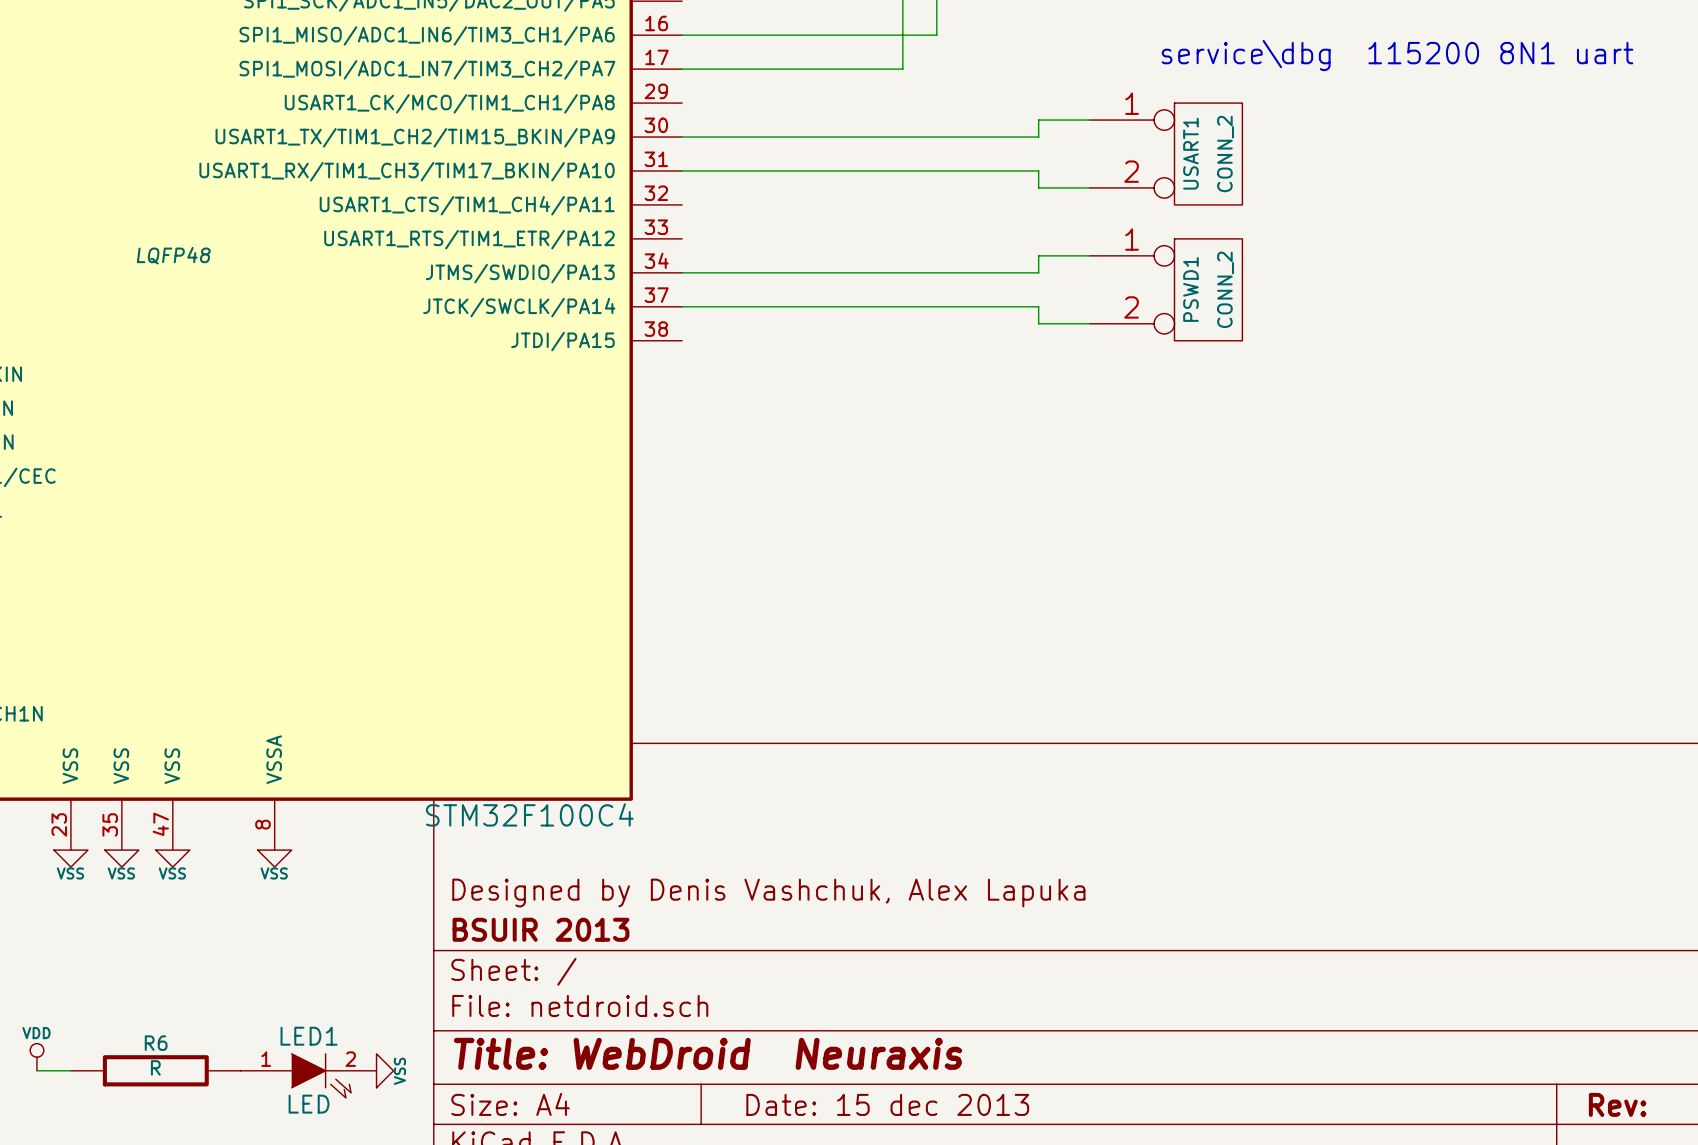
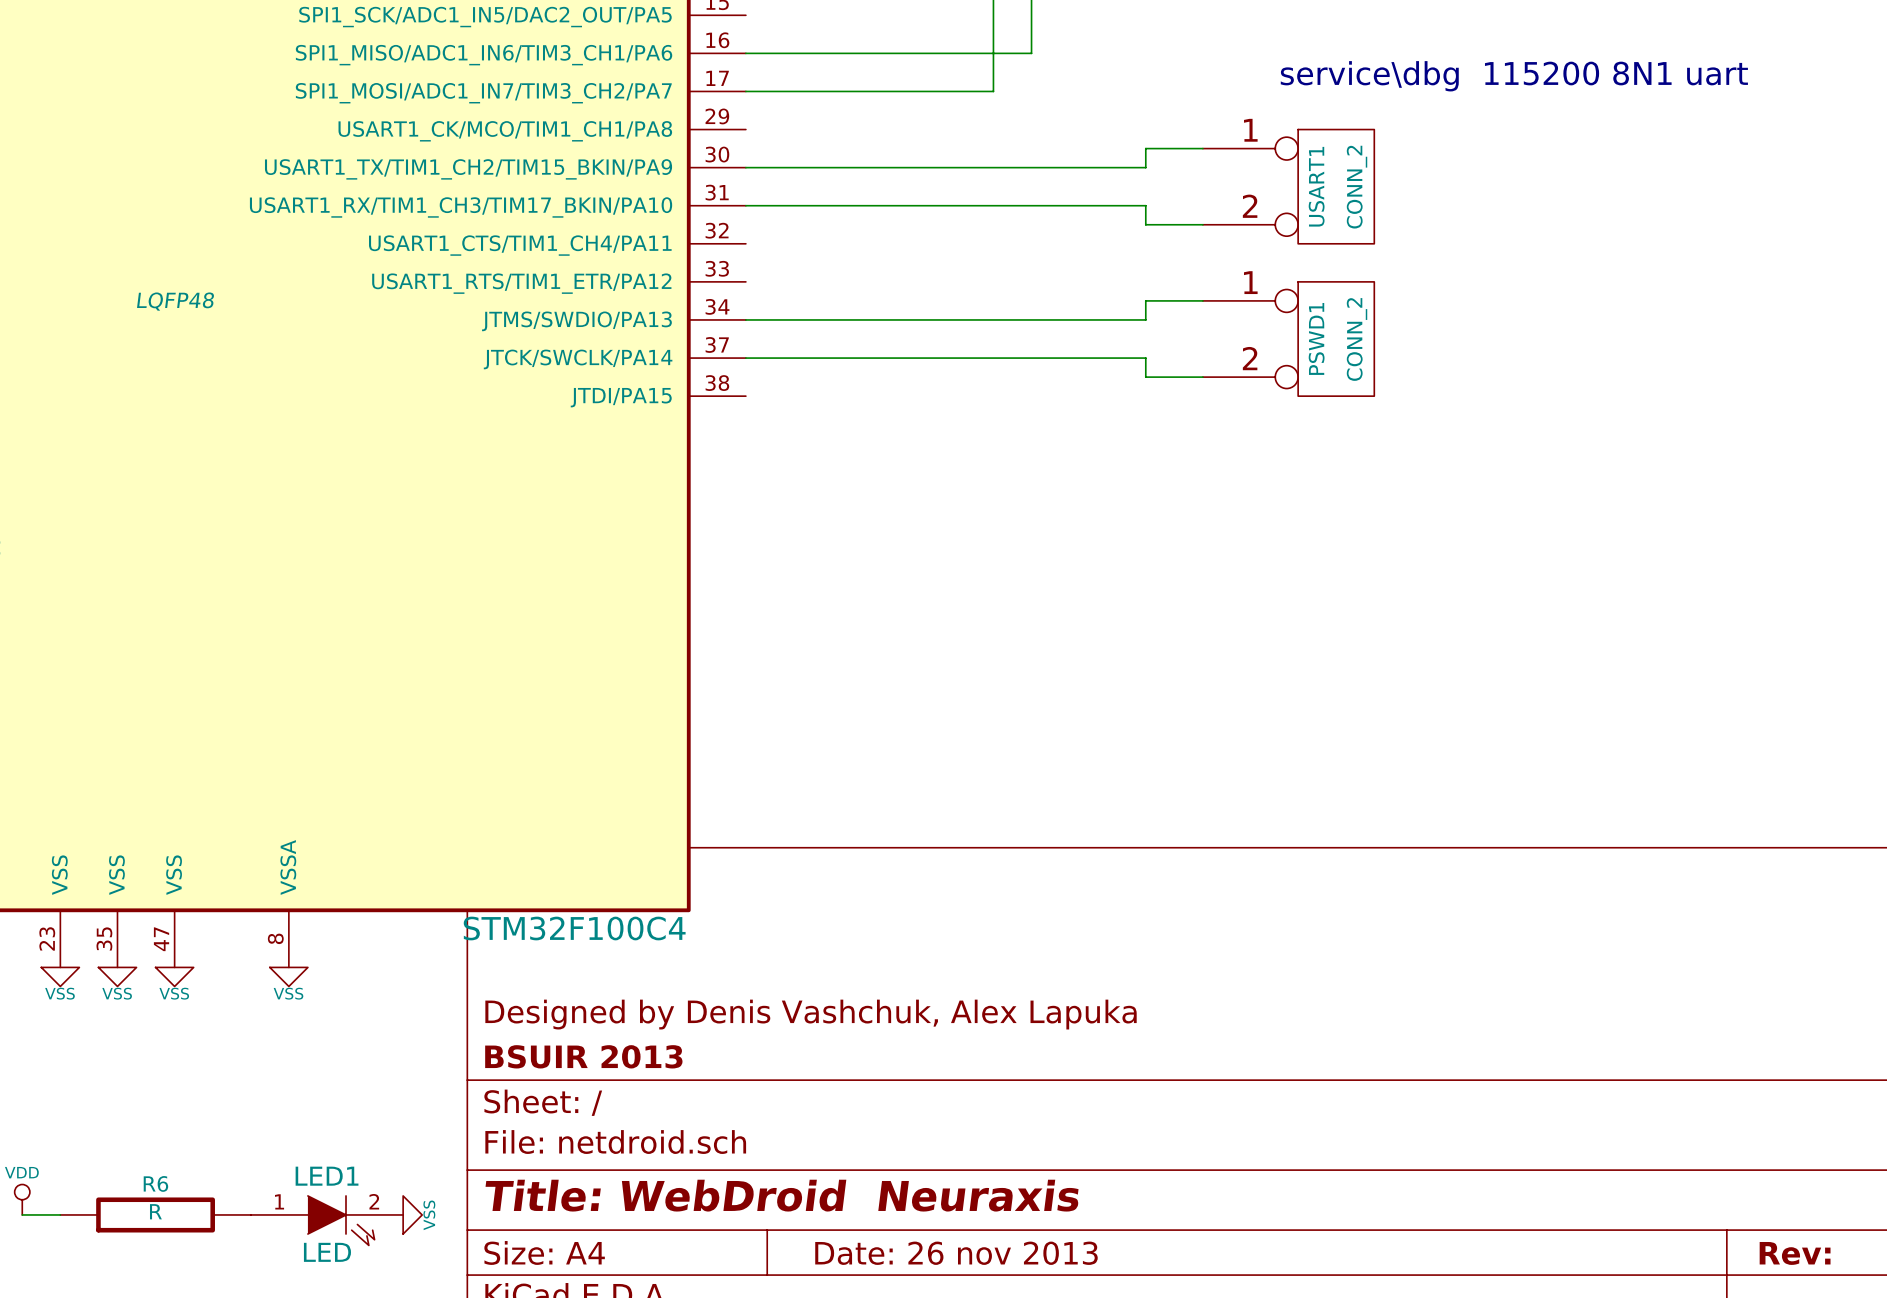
title block: Date: 15 dec 2013 (887, 1104) -> Date: 26 nov 2013 (956, 1253)

